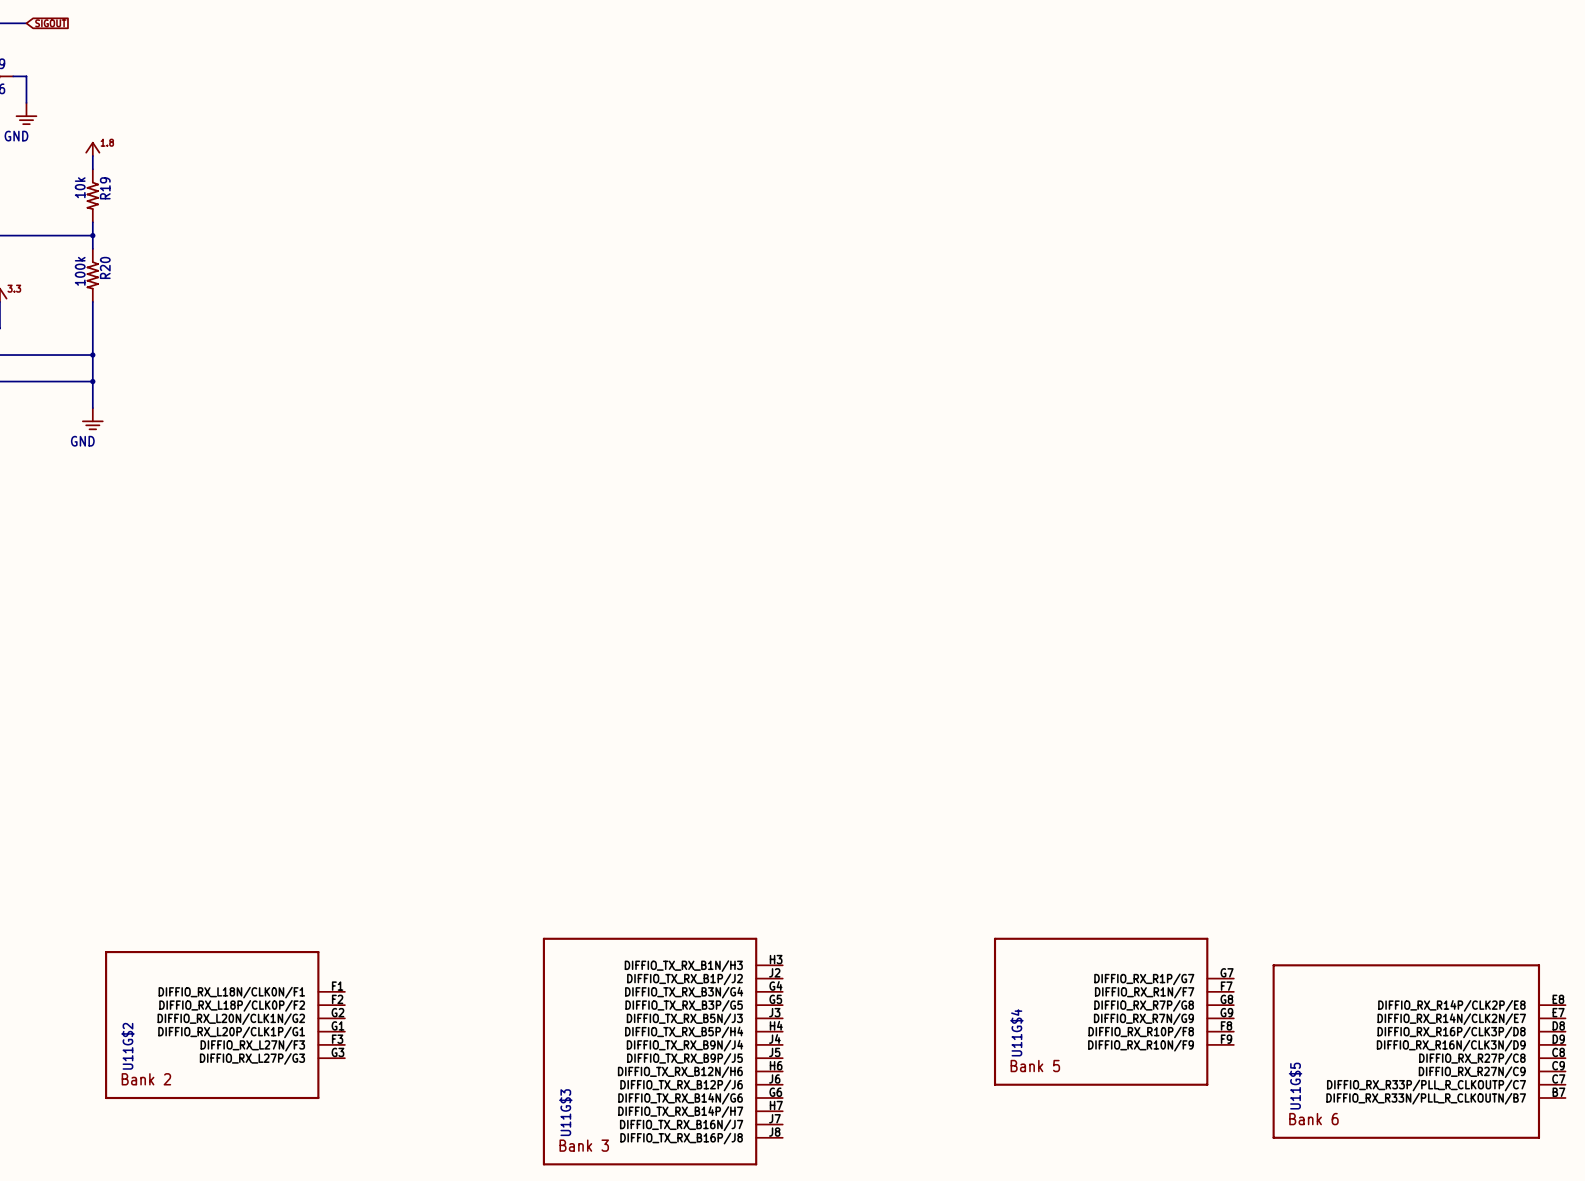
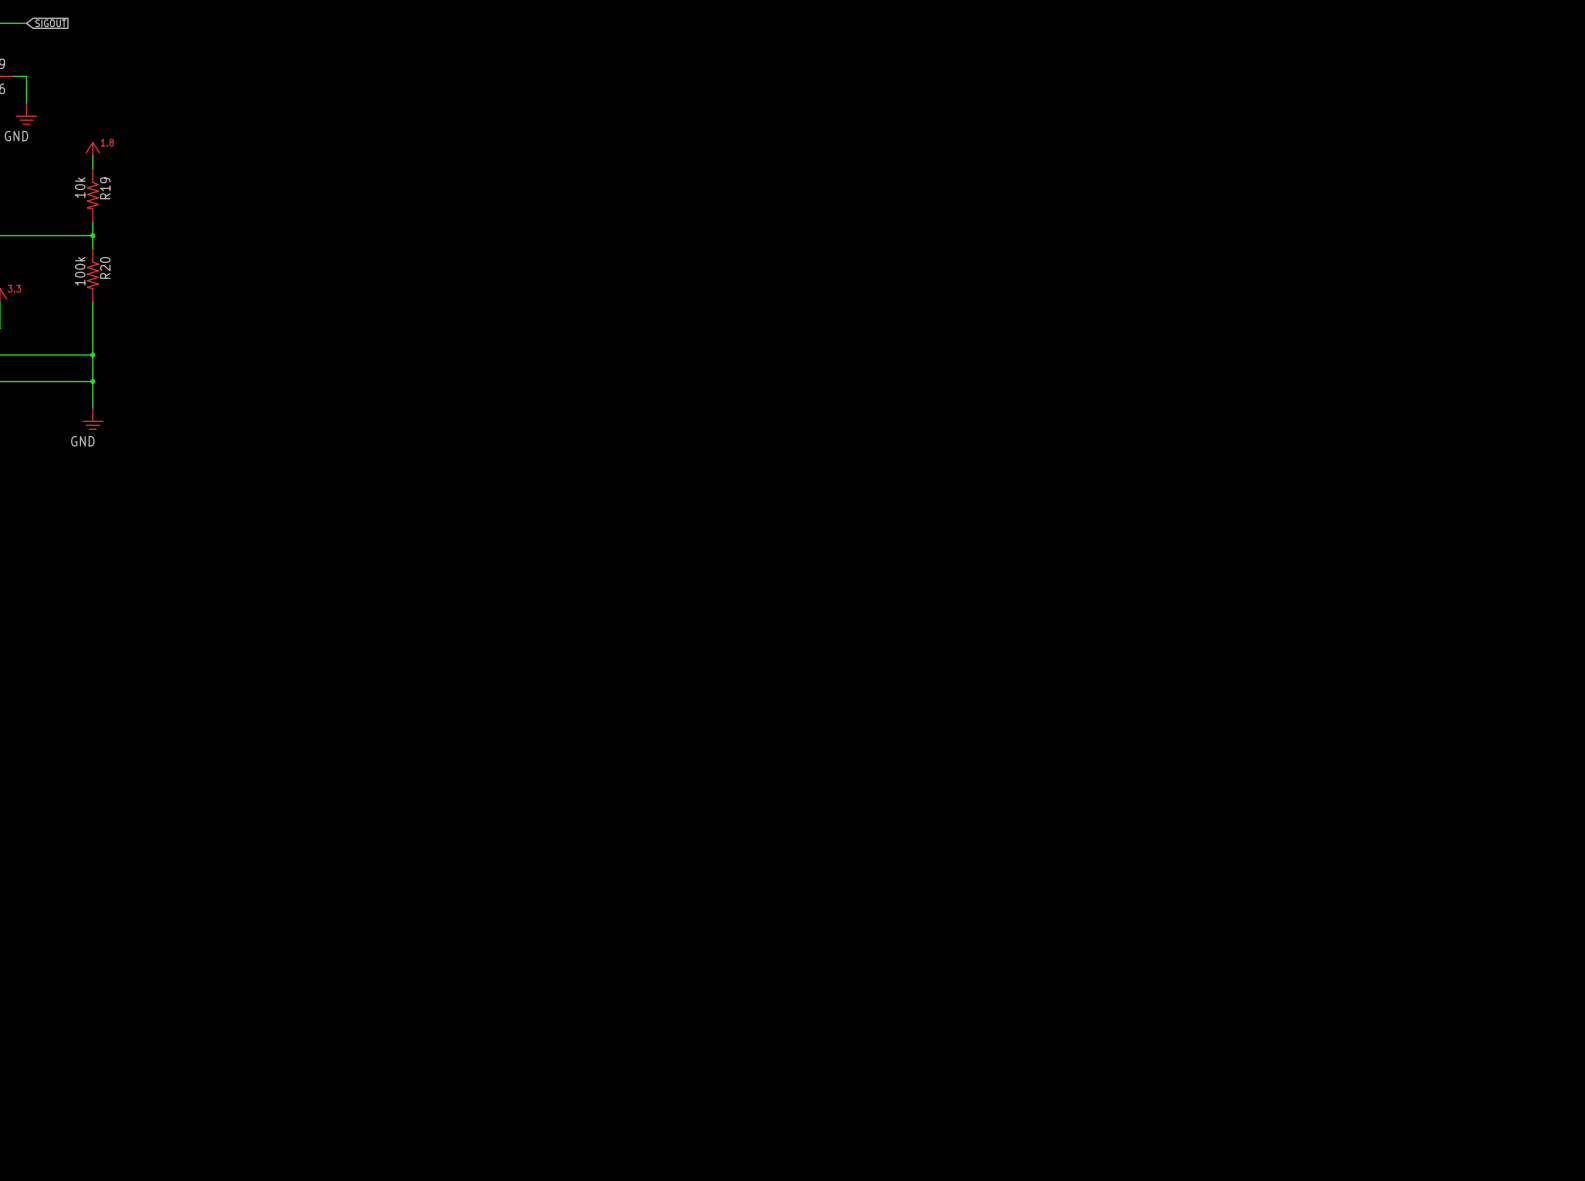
U11G$4: (1113, 1011) -> none
U11G$2: (224, 1025) -> none
U11G$3: (662, 1051) -> none
U11G$5: (1419, 1051) -> none

